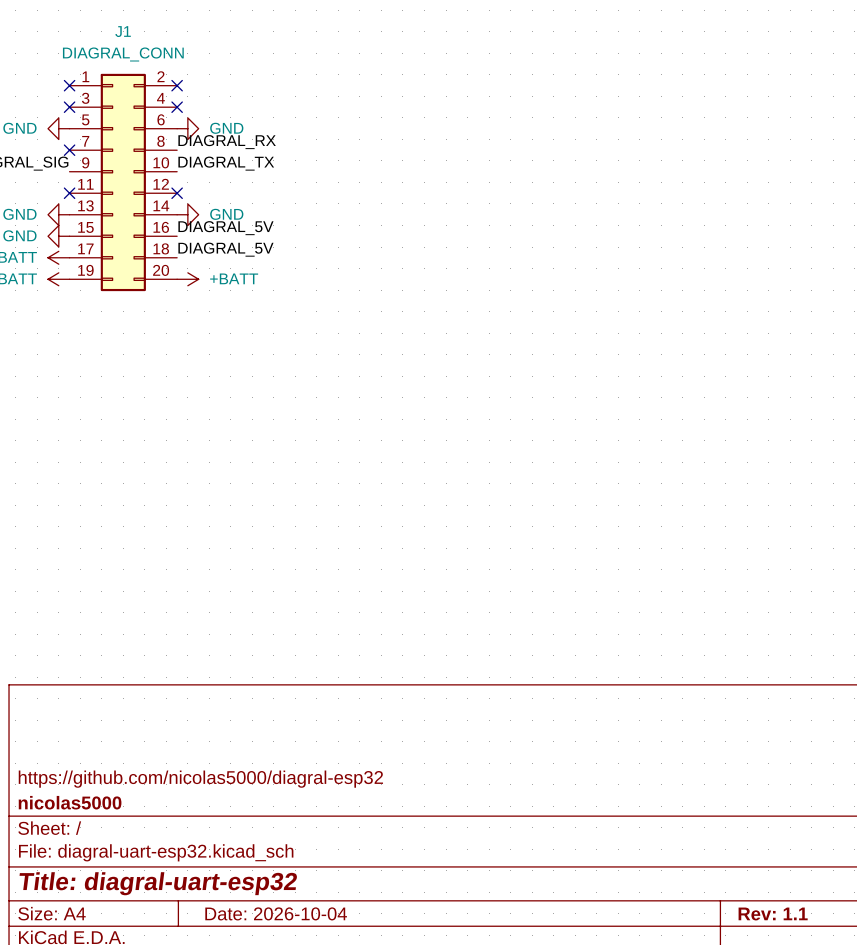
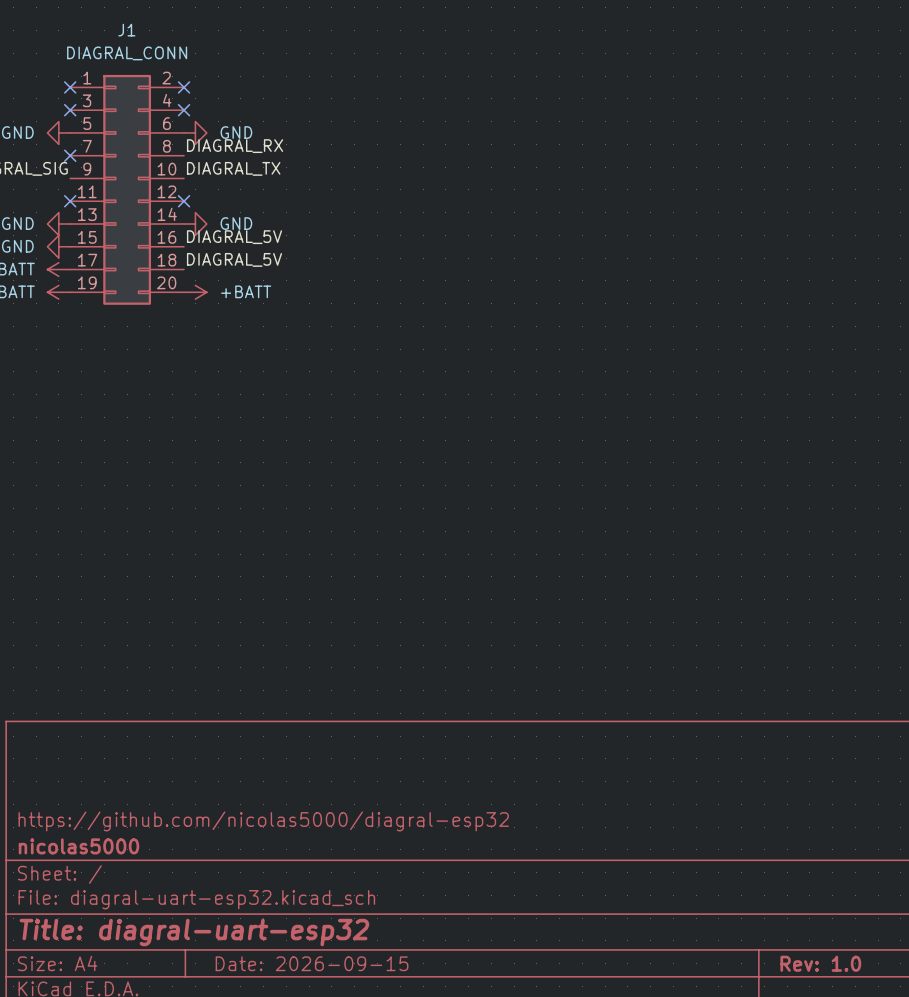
title block: Date: 2026-10-04 (276, 913) -> Date: 2026-09-15 (312, 963)
title block: Rev: 1.1 (773, 914) -> Rev: 1.0 (820, 963)

